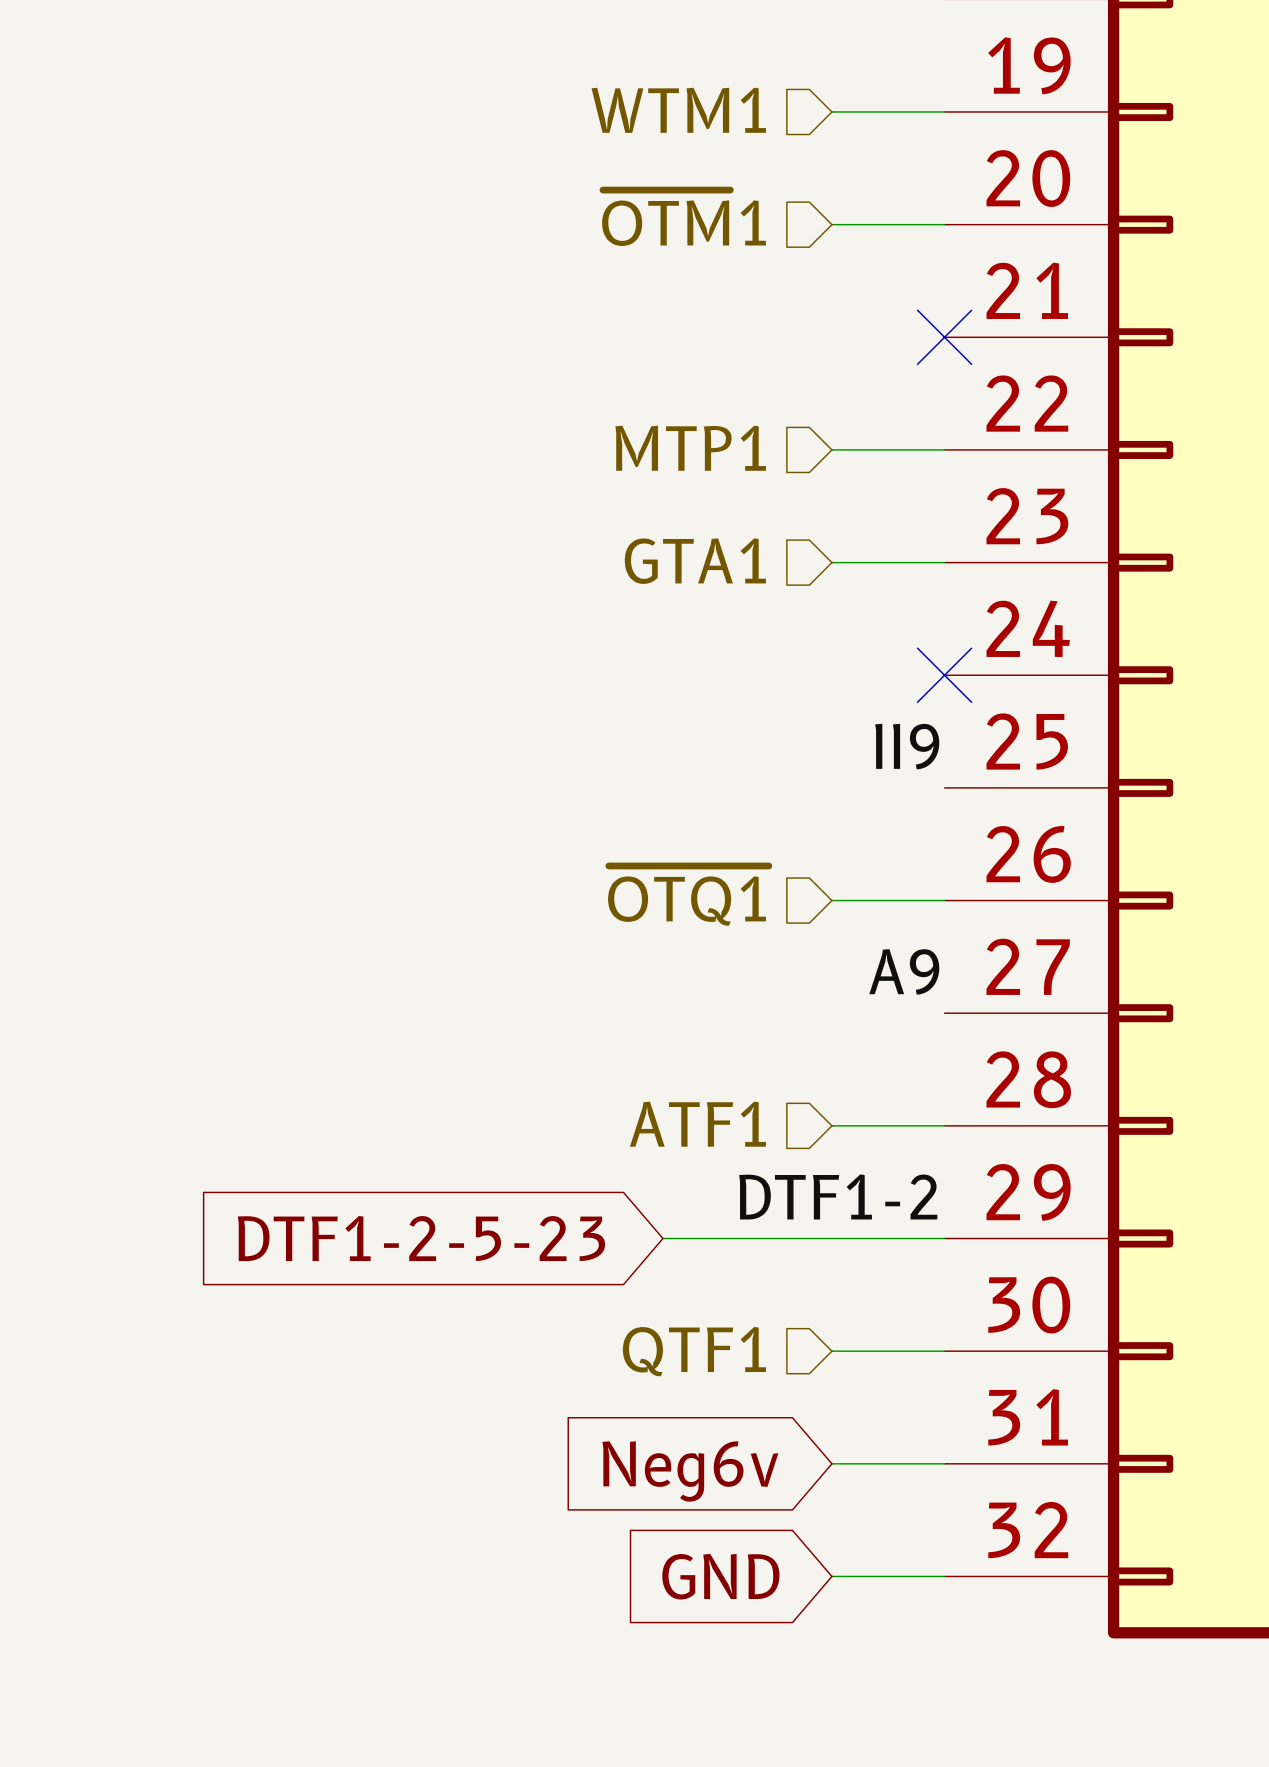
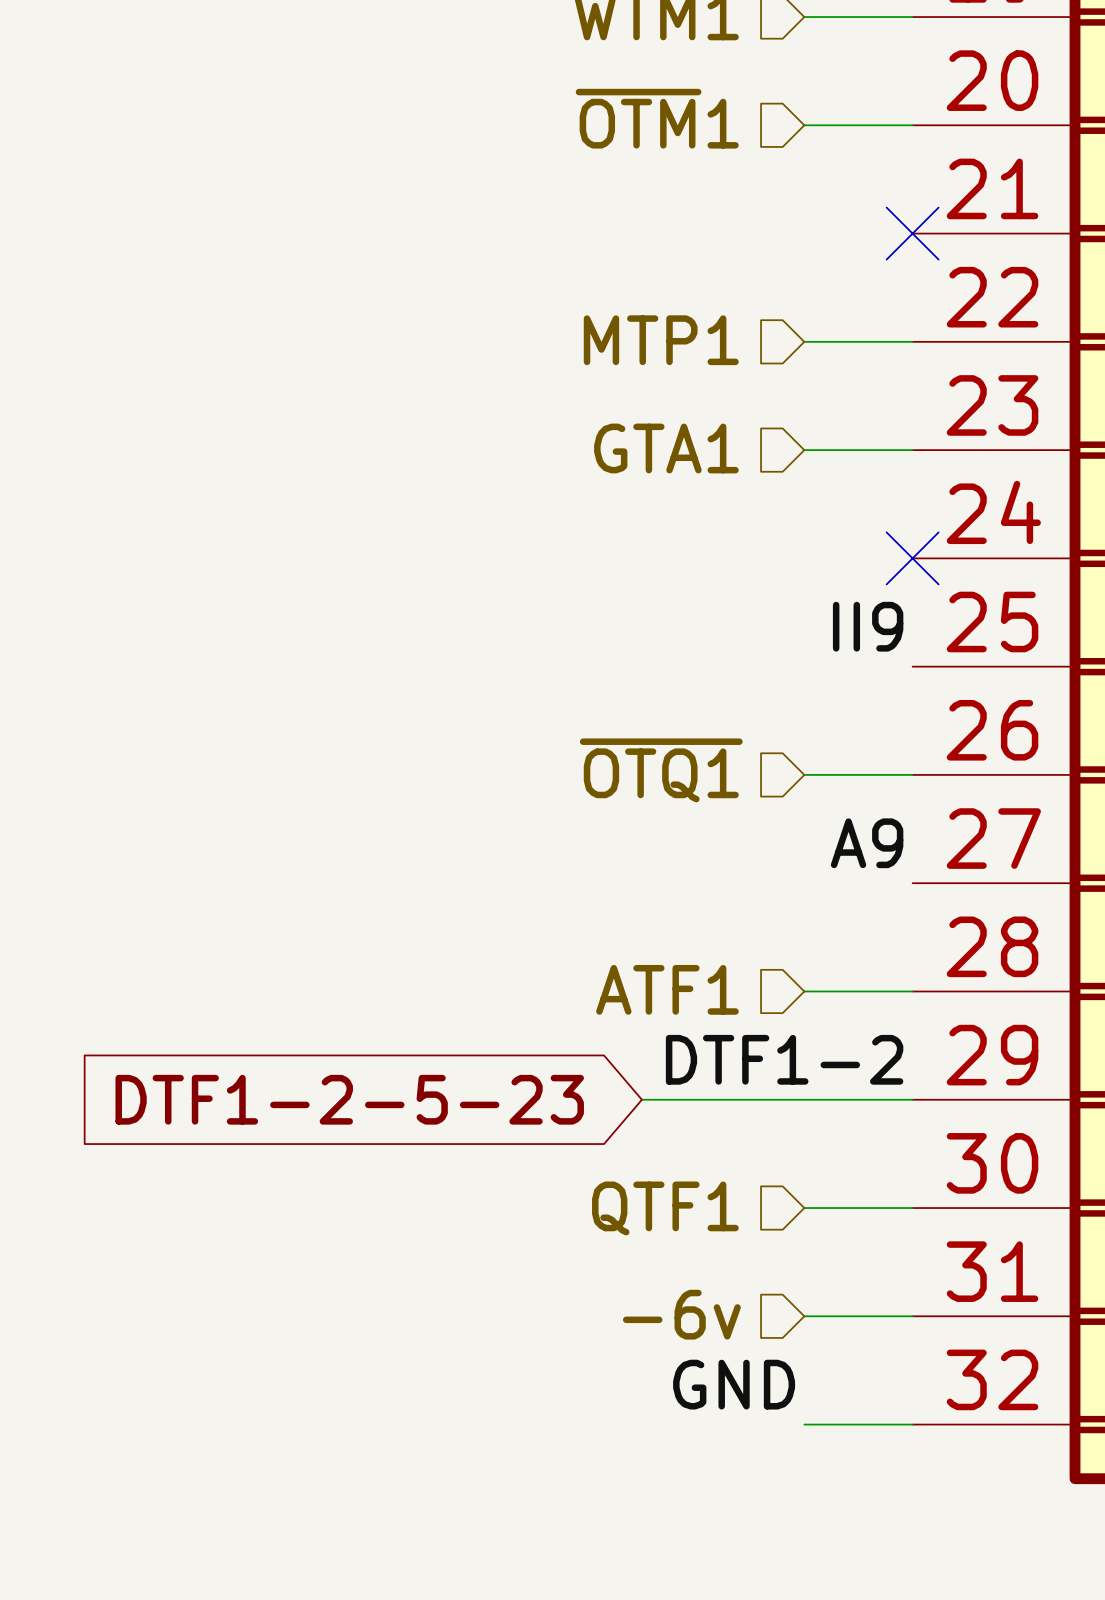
hierarchical label: none -> -6v (681, 1314)
global label: Neg6v (690, 1471) -> none
label: none -> GND (734, 1384)
global label: GND (720, 1576) -> none

